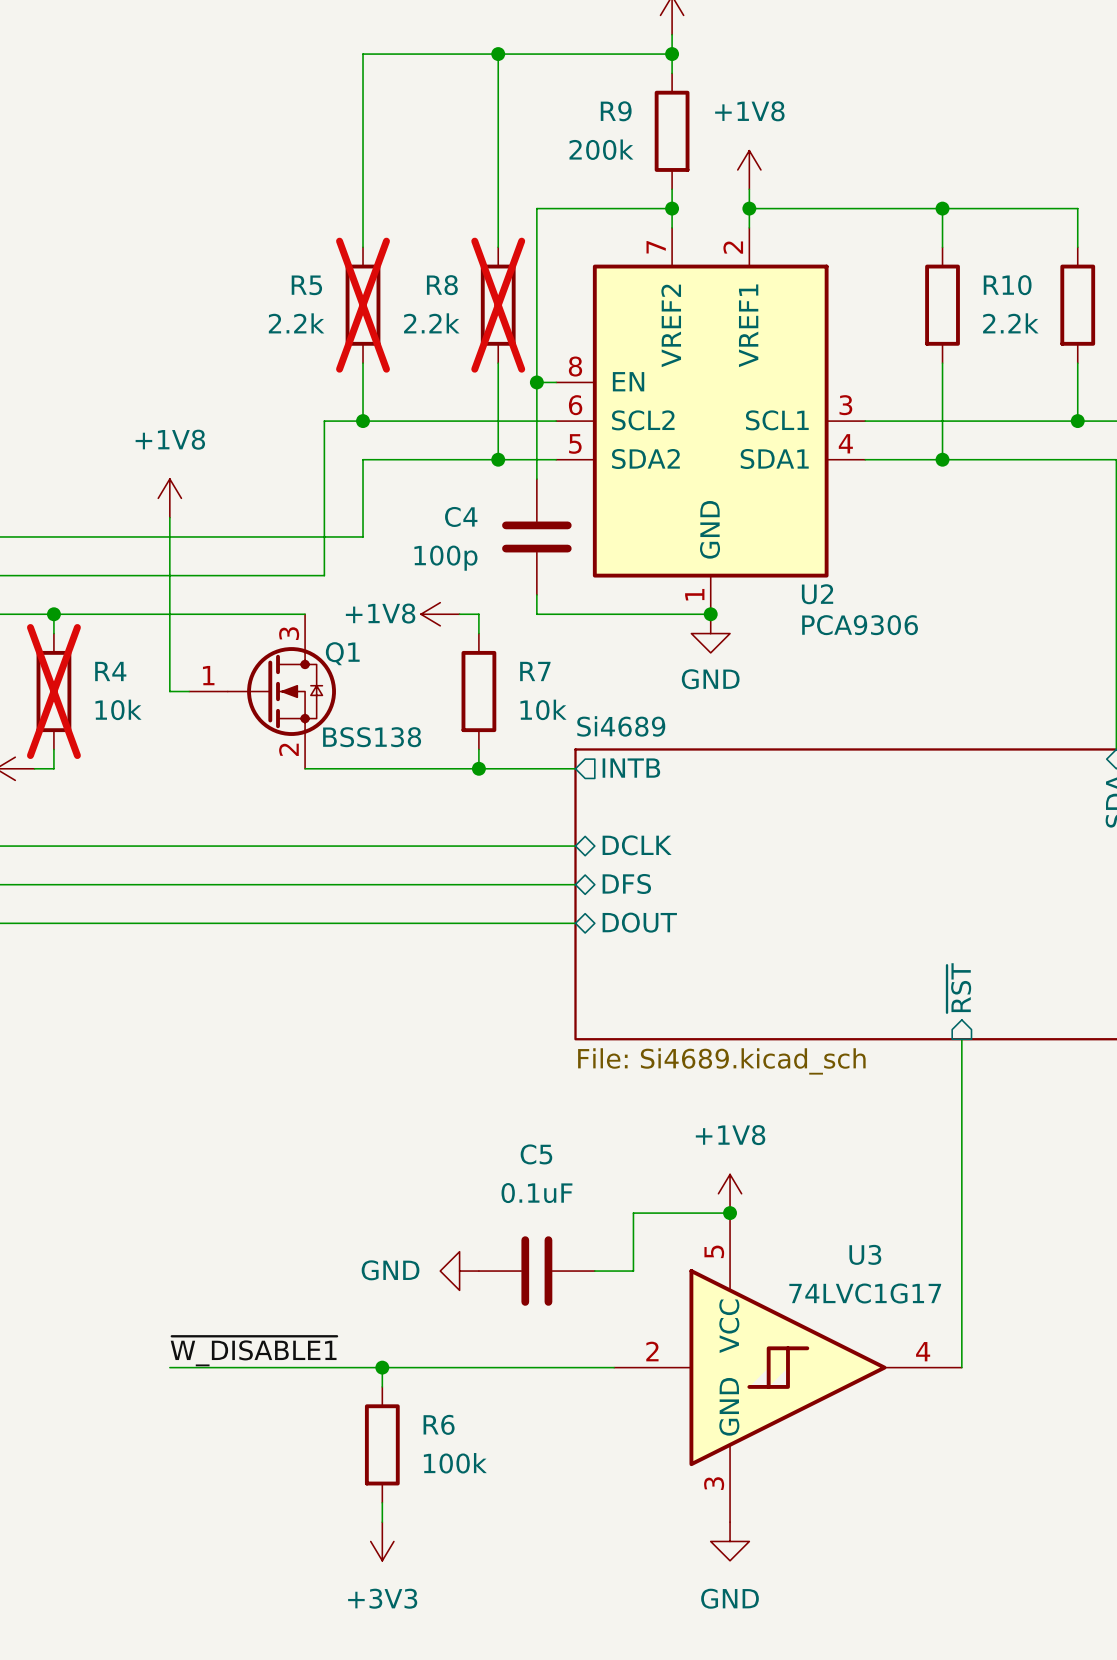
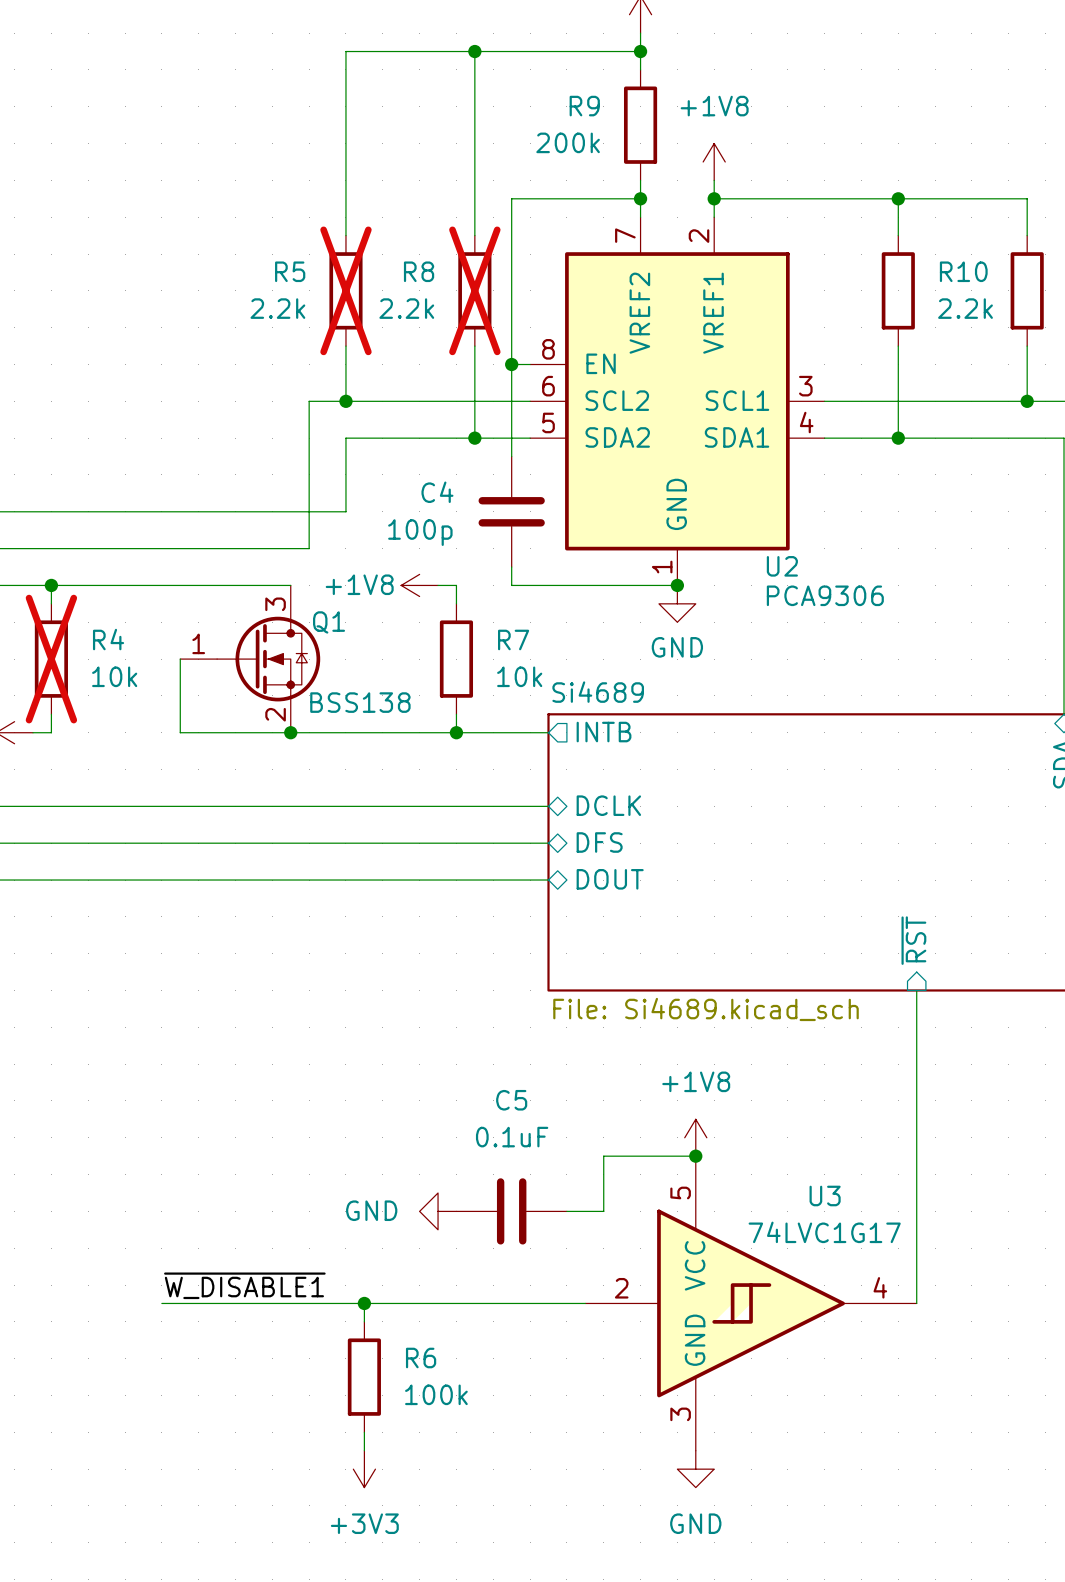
power symbol: +1V8 (169, 498) -> none
wire: (169, 517) (169, 691) (189, 691) -> (290, 732) (180, 732) (180, 659)
junction: none -> (290, 732)

